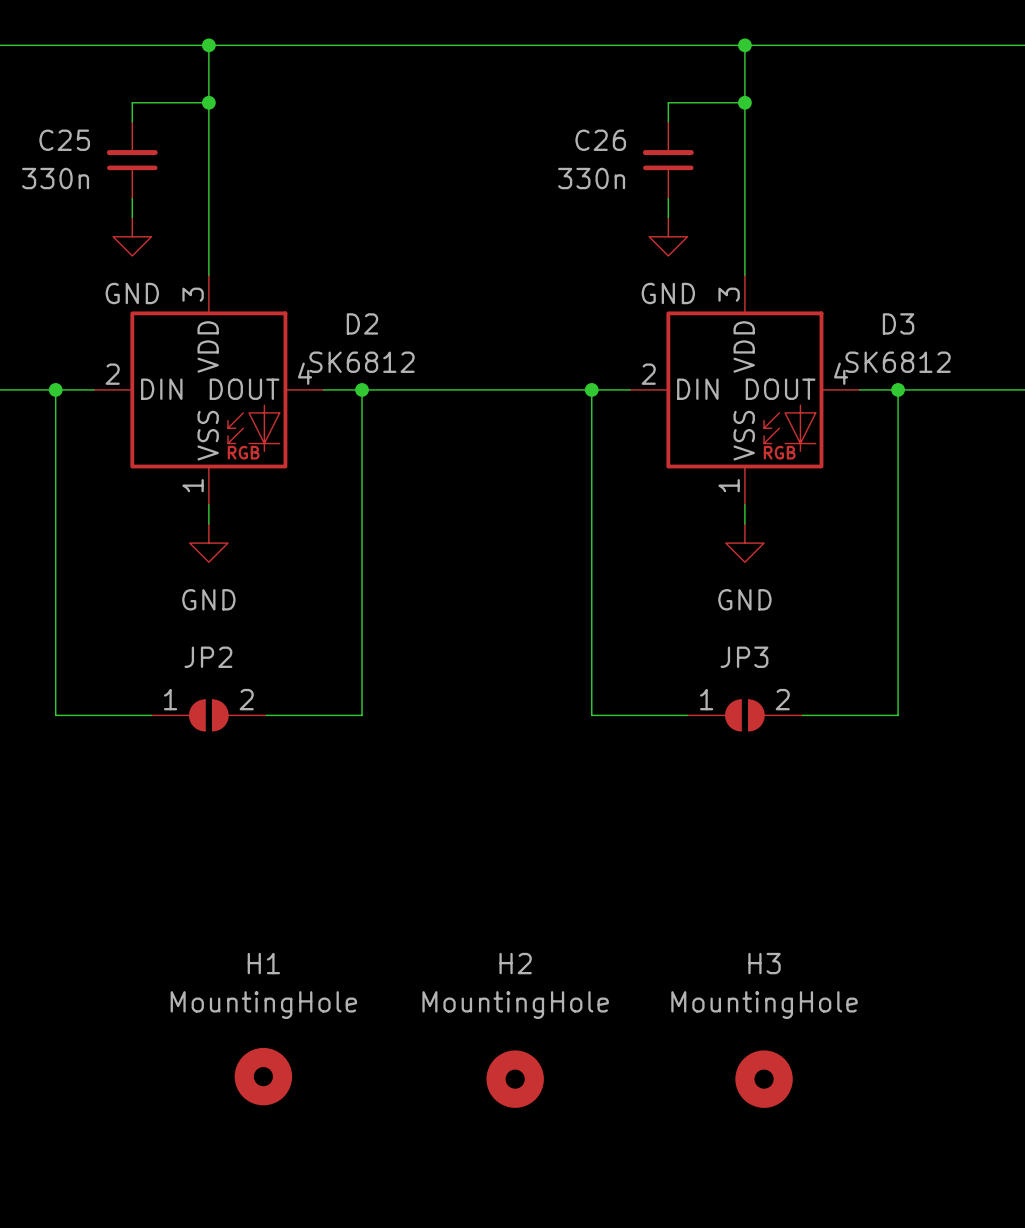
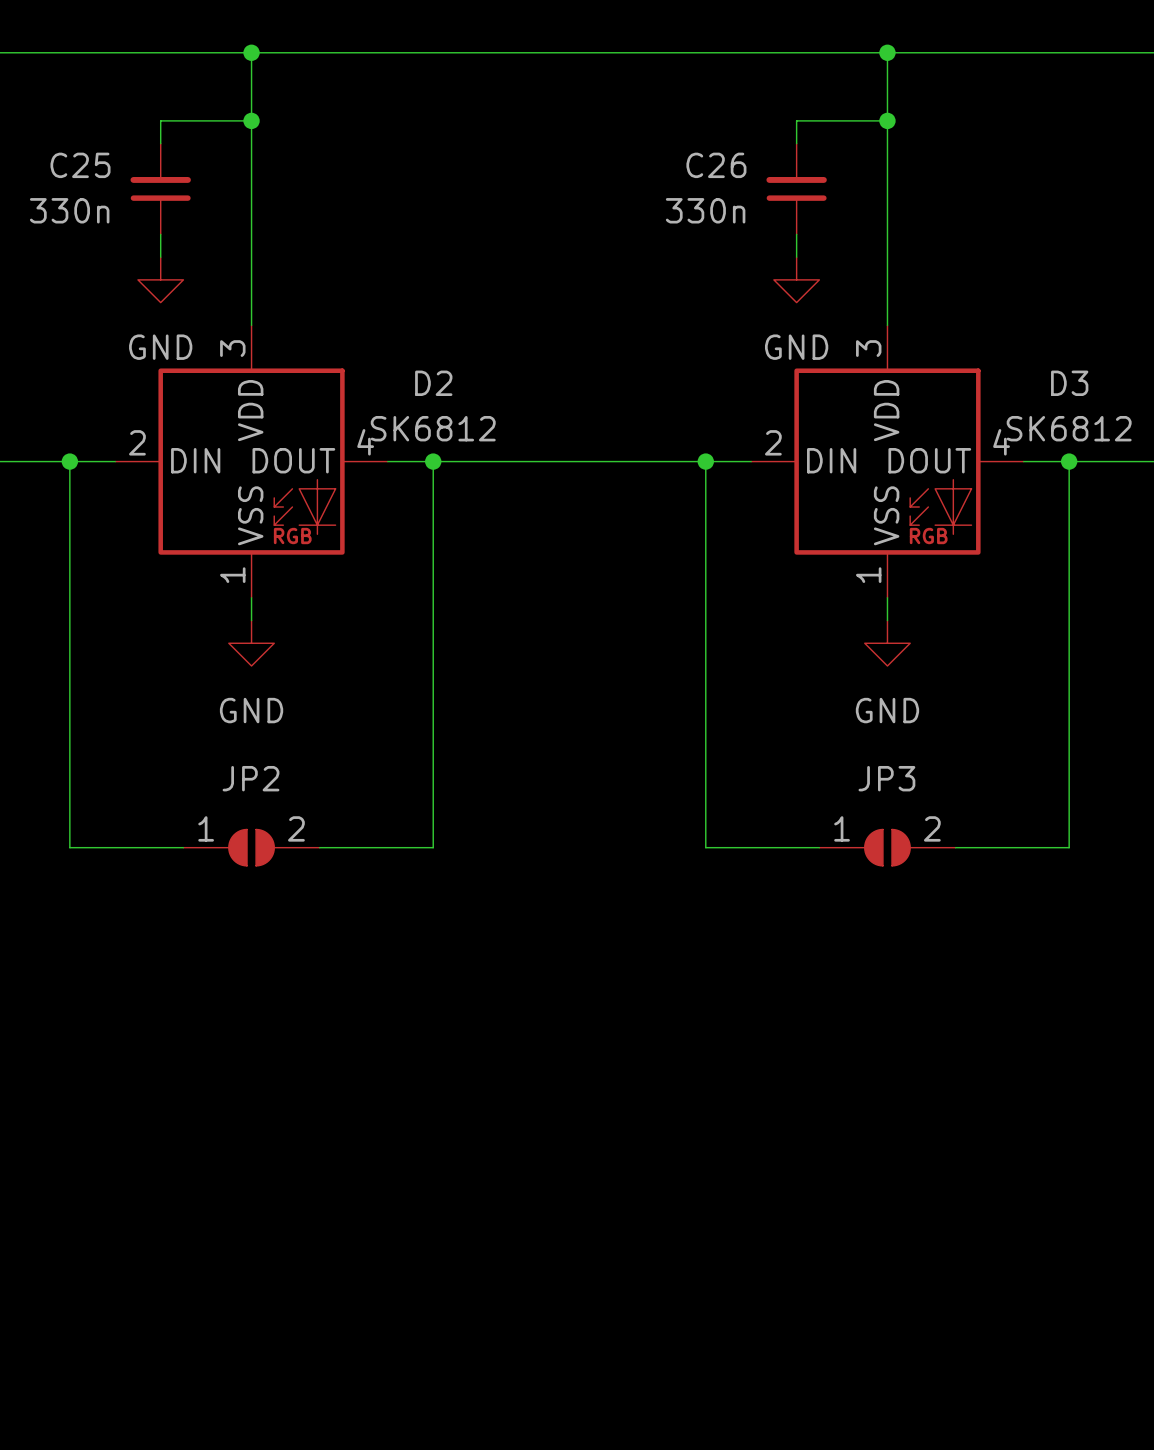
H1: MountingHole (263, 1076) -> none
H2: MountingHole (515, 1079) -> none
H3: MountingHole (764, 1079) -> none

